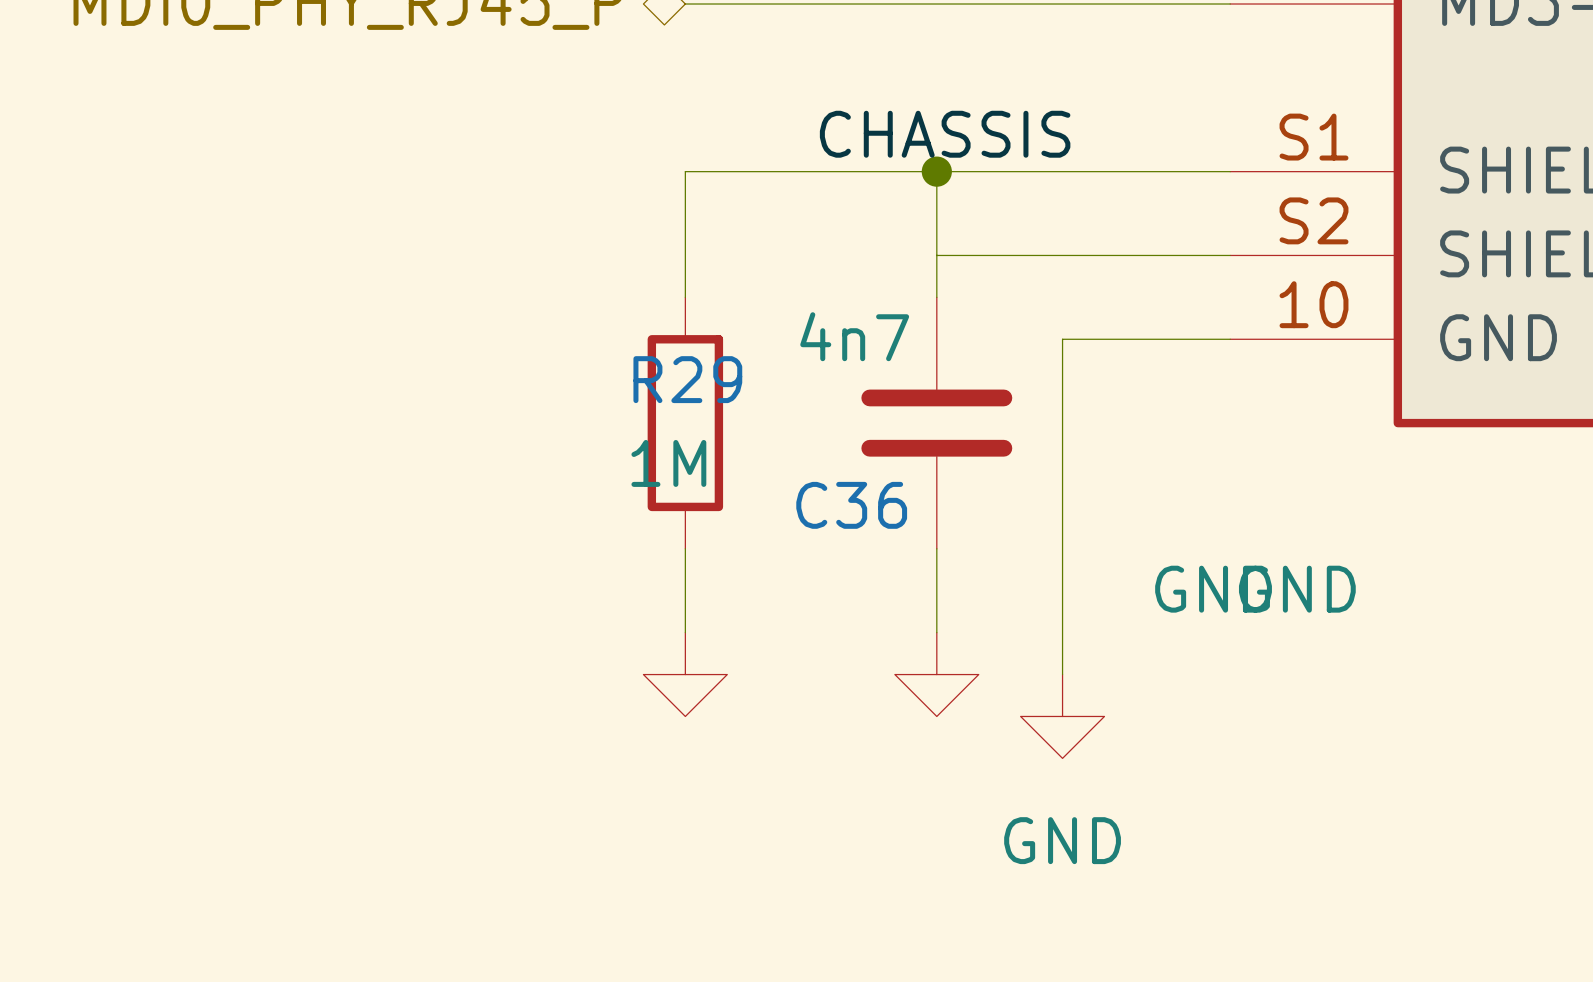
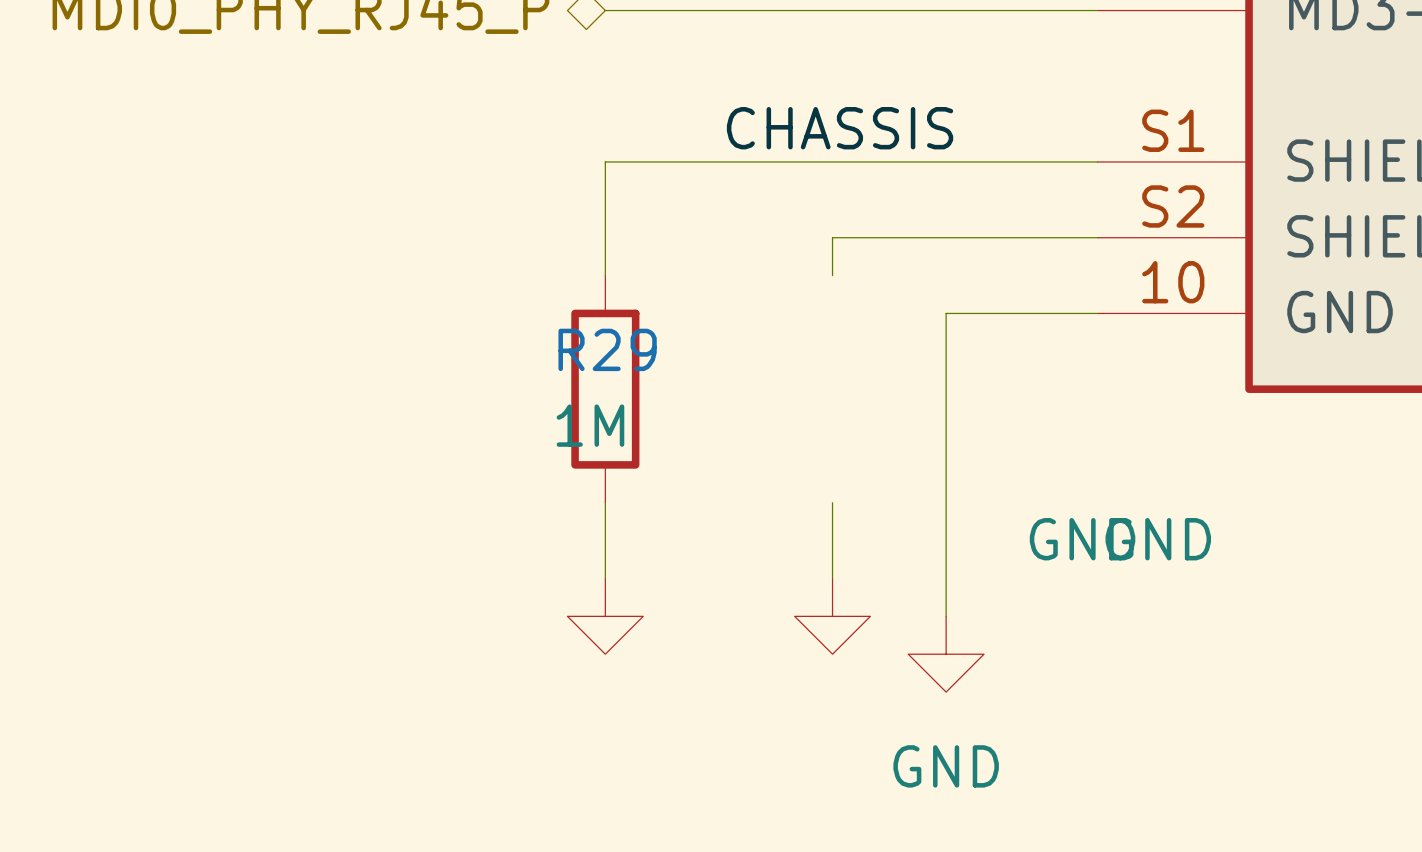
wire: (936, 171) (936, 255) -> none
junction: (936, 171) -> none
C36: 4n7 (936, 423) -> none

